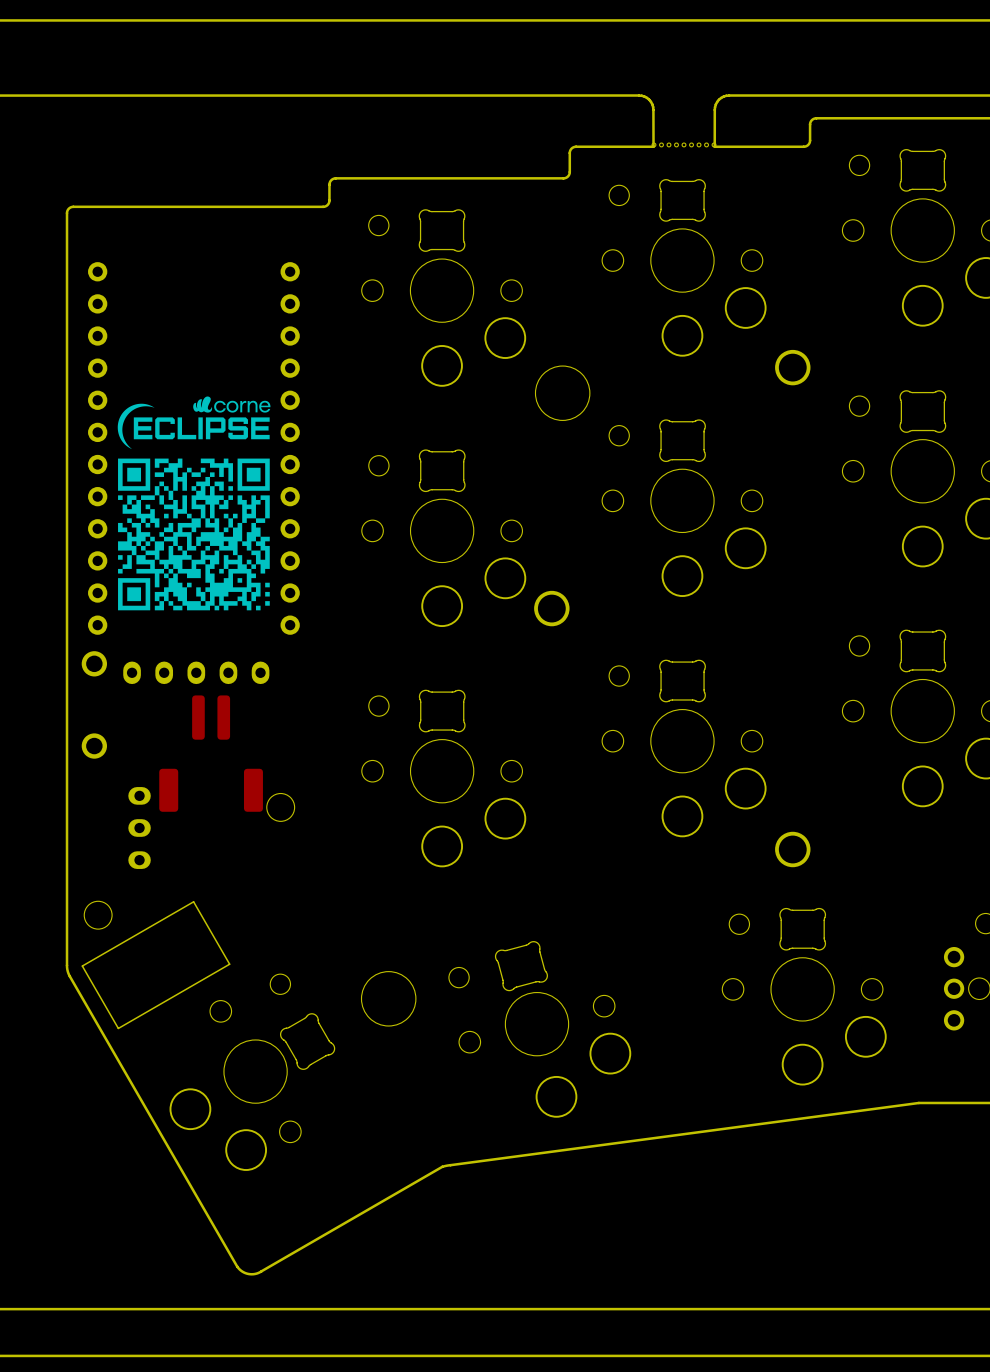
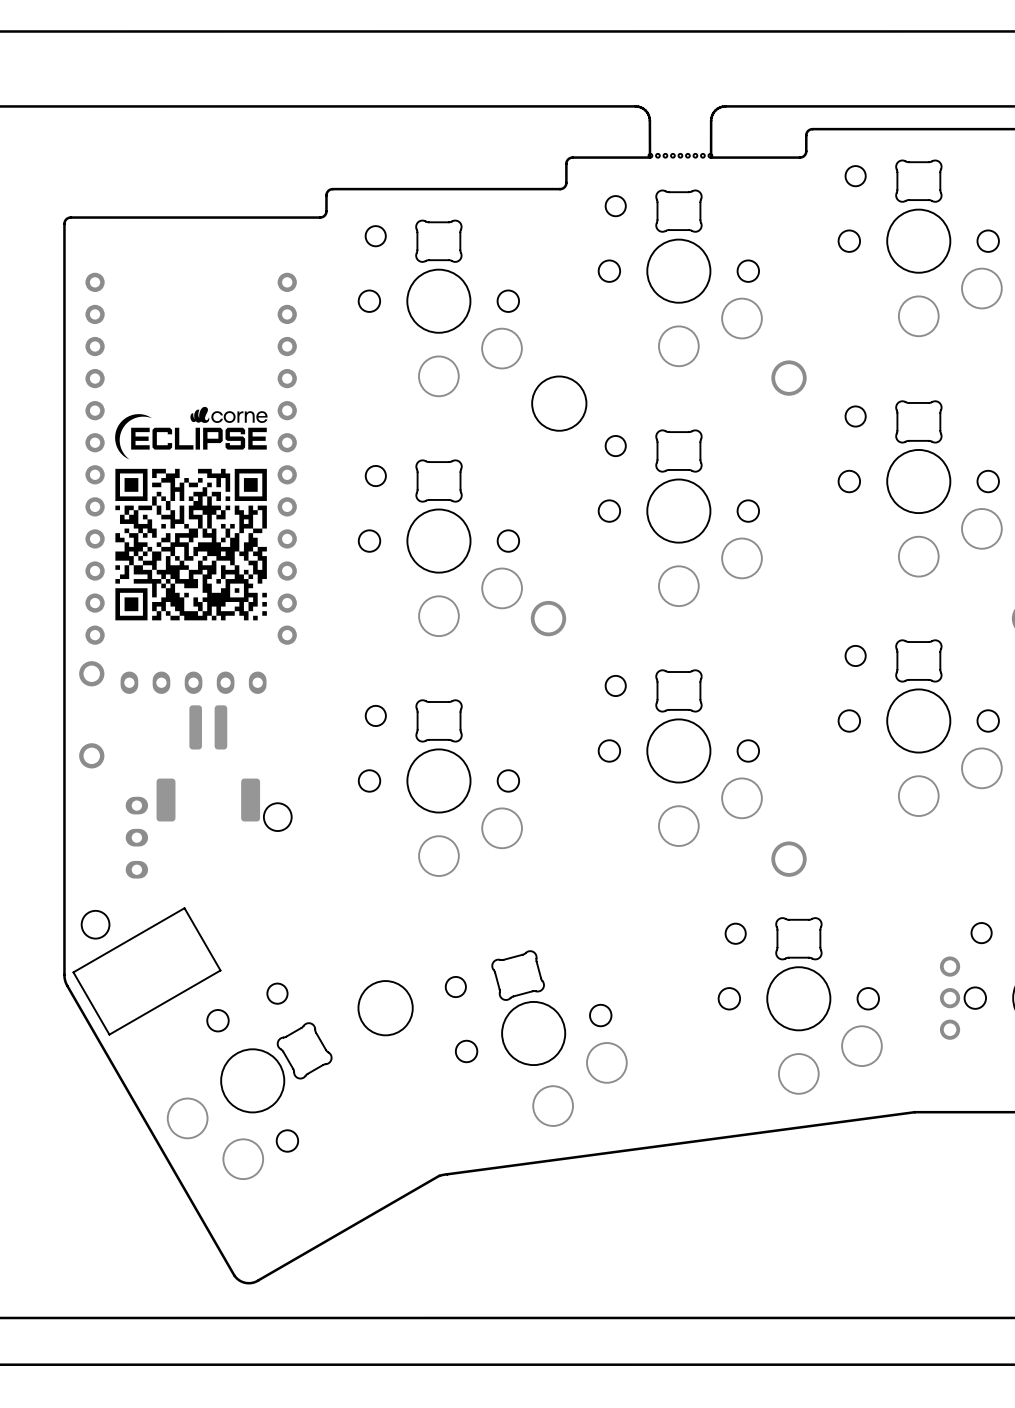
board edge: none -> (184, 908) (73, 972) (109, 1034) (220, 970) (184, 908)
drawing: [81, 901, 231, 1030] -> none

